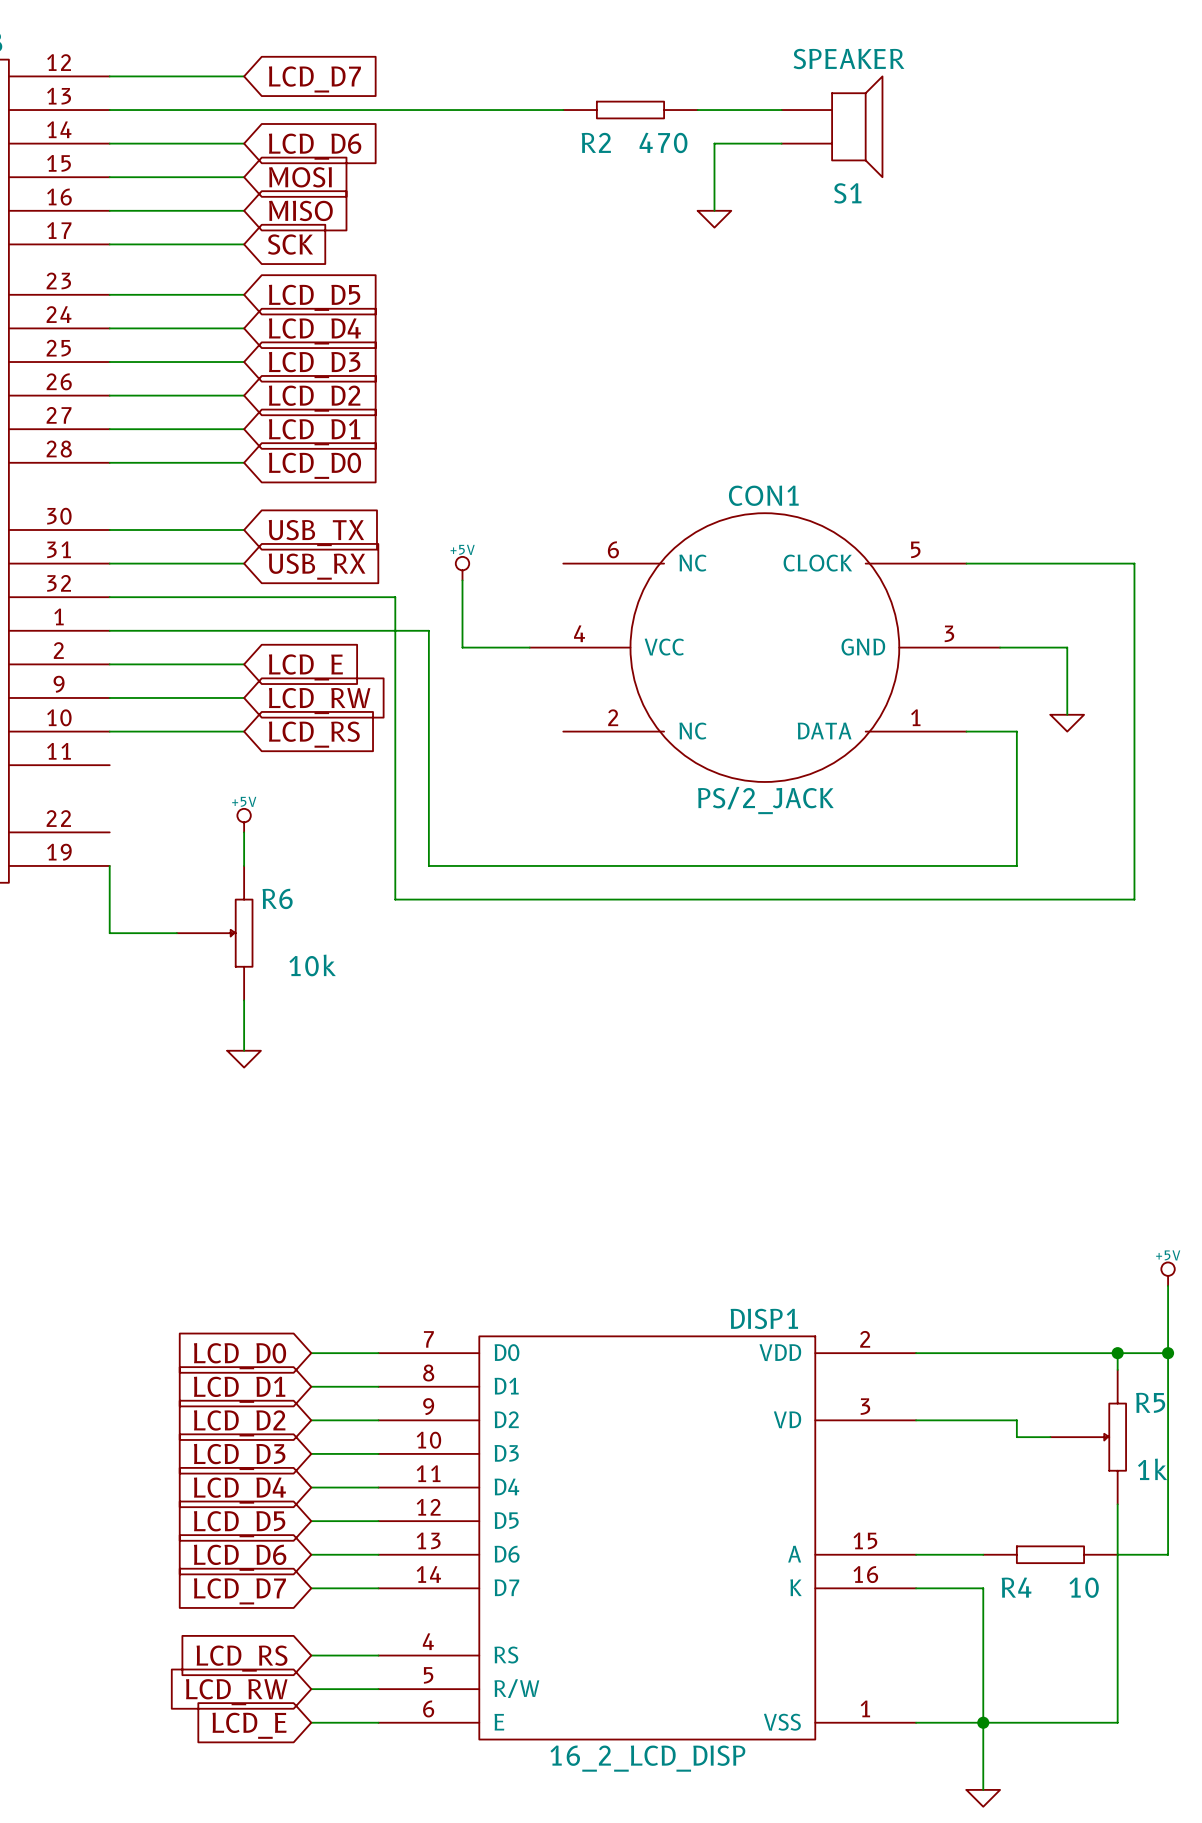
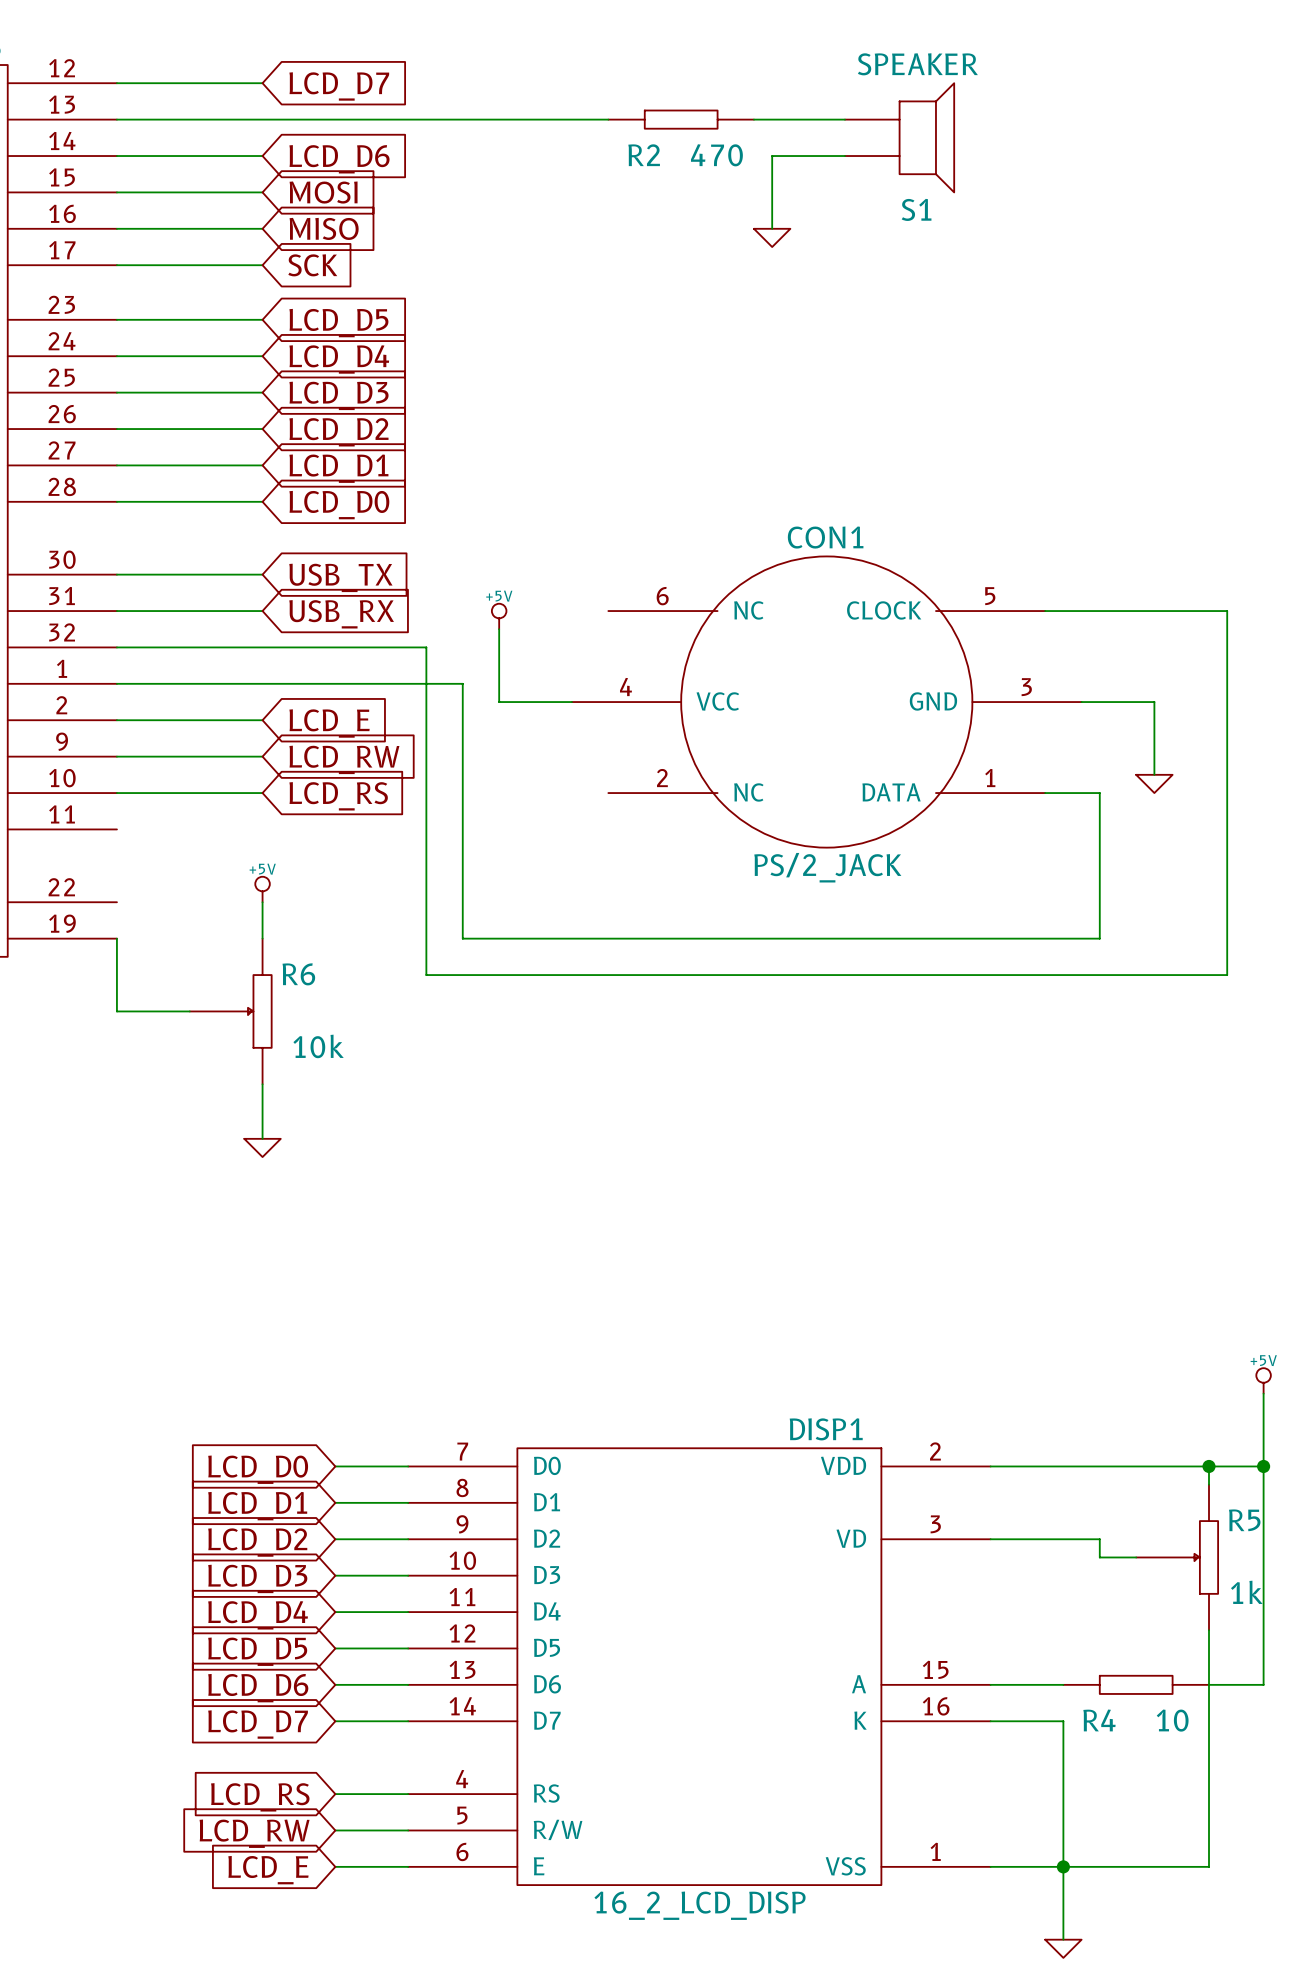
R6 text position: 10k (312, 965) -> 10k (318, 1046)

